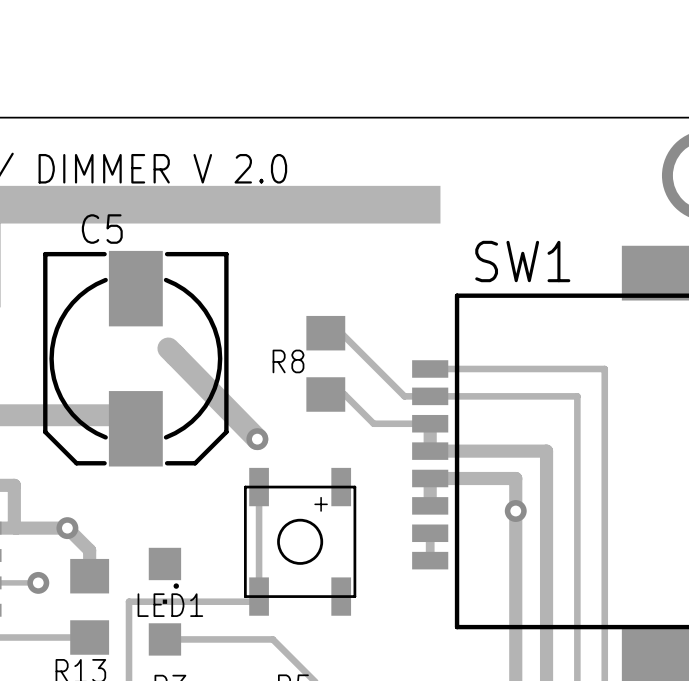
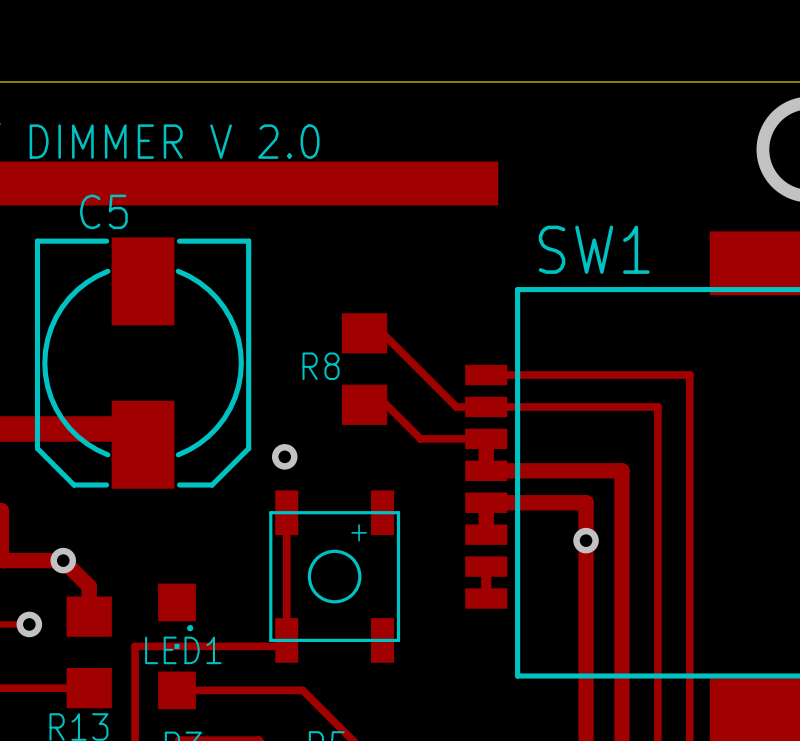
track: (168, 348) (257, 439) -> none

